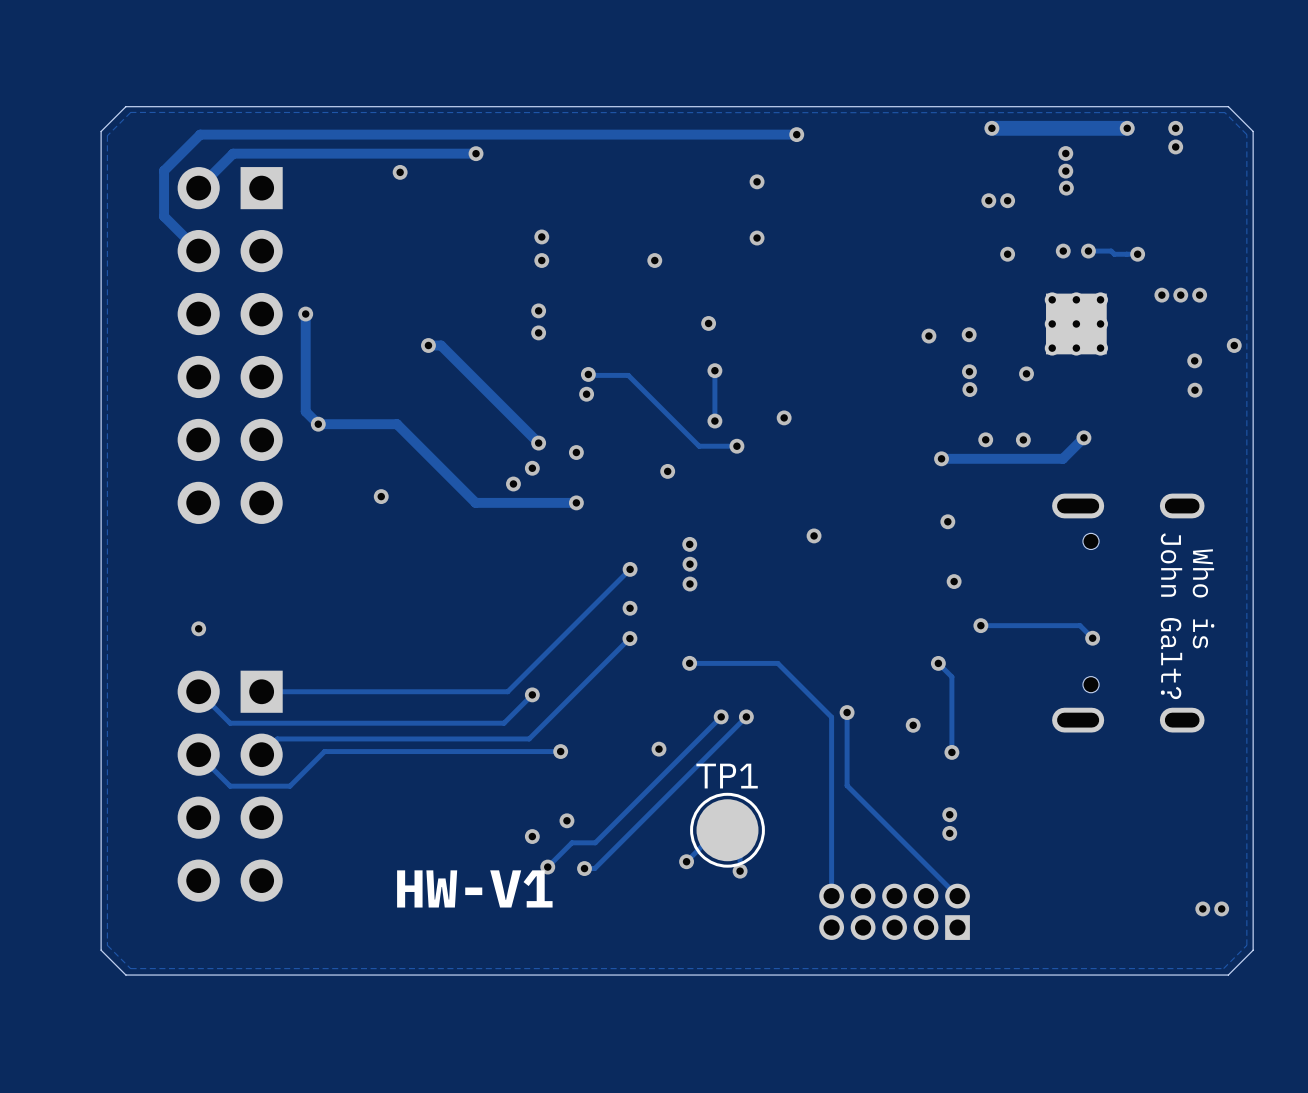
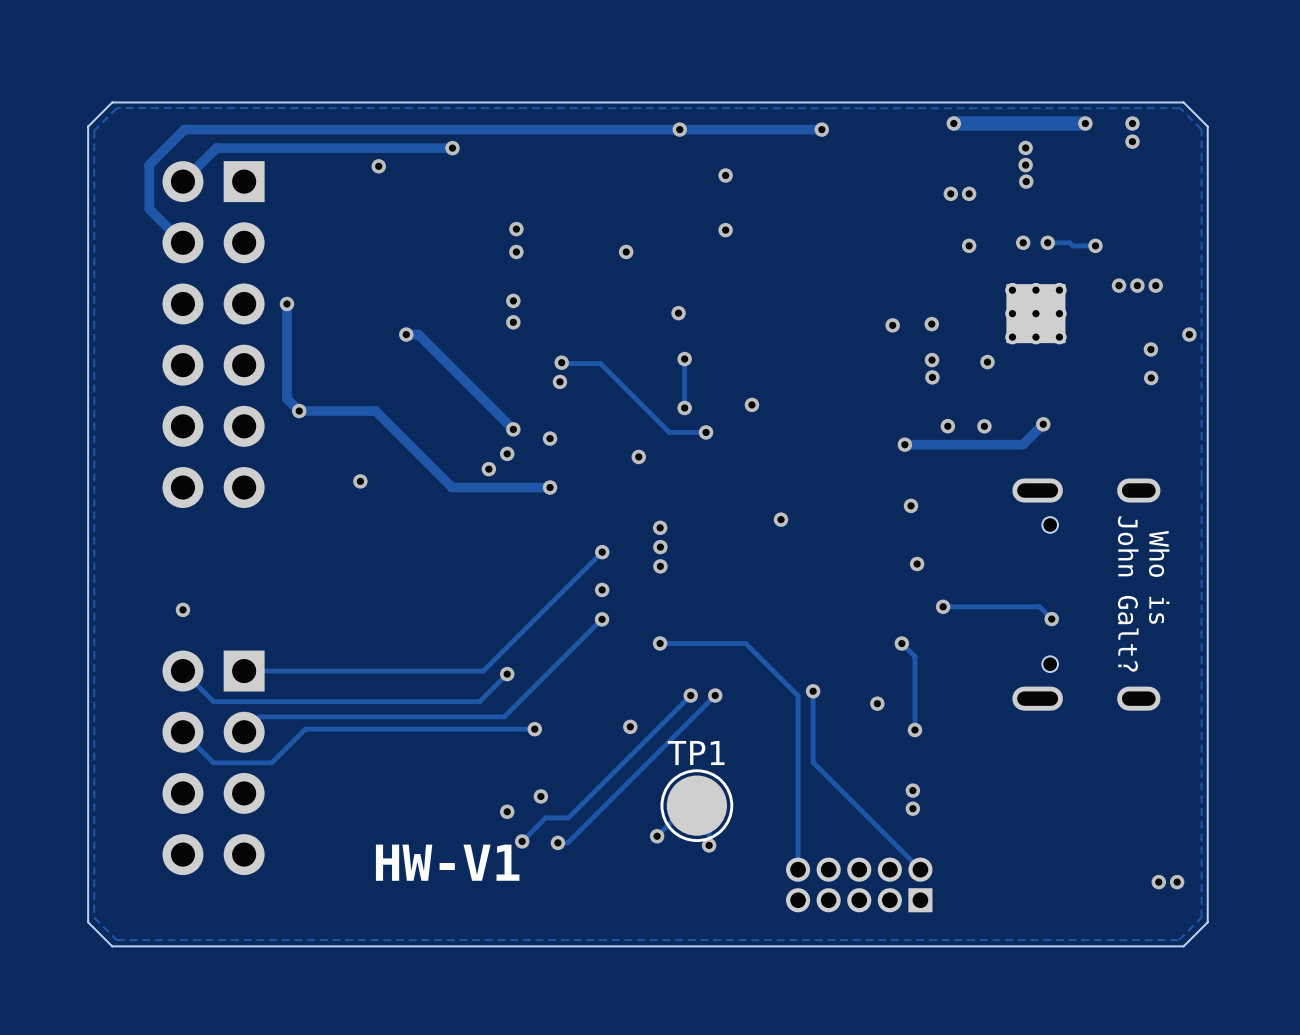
via: none -> (679, 129)
via: (796, 134) -> none
track: none -> (821, 129) (764, 129)
via: none -> (821, 129)

